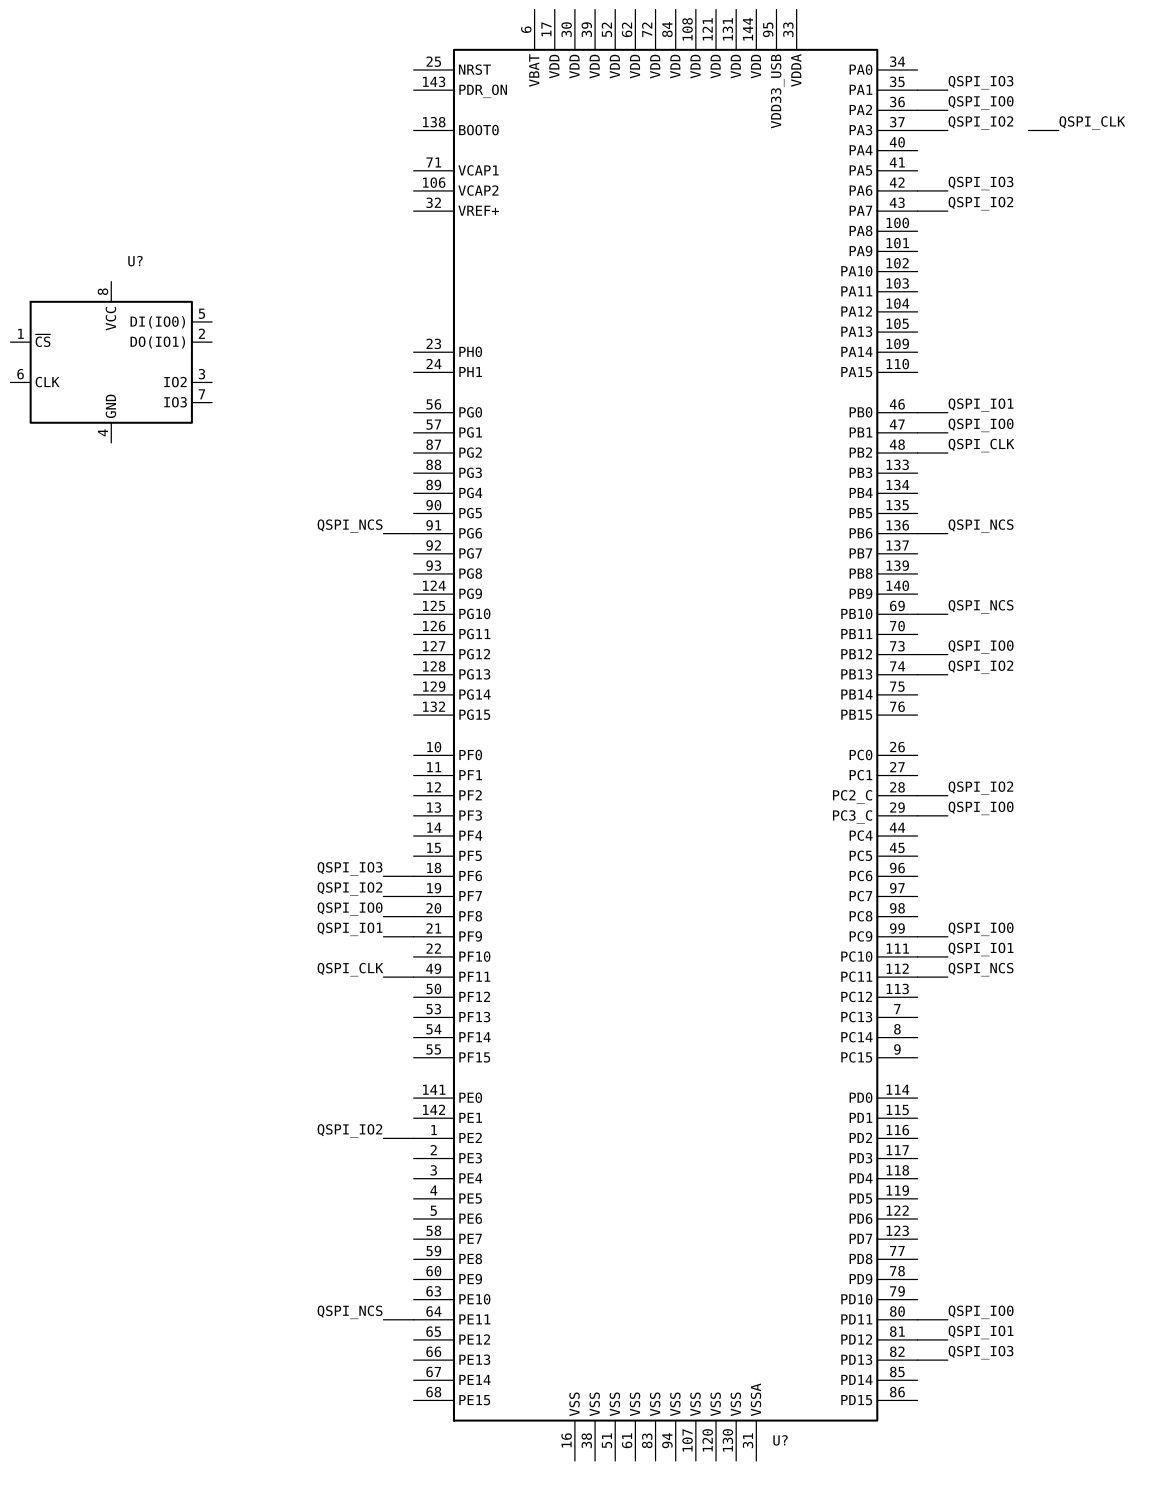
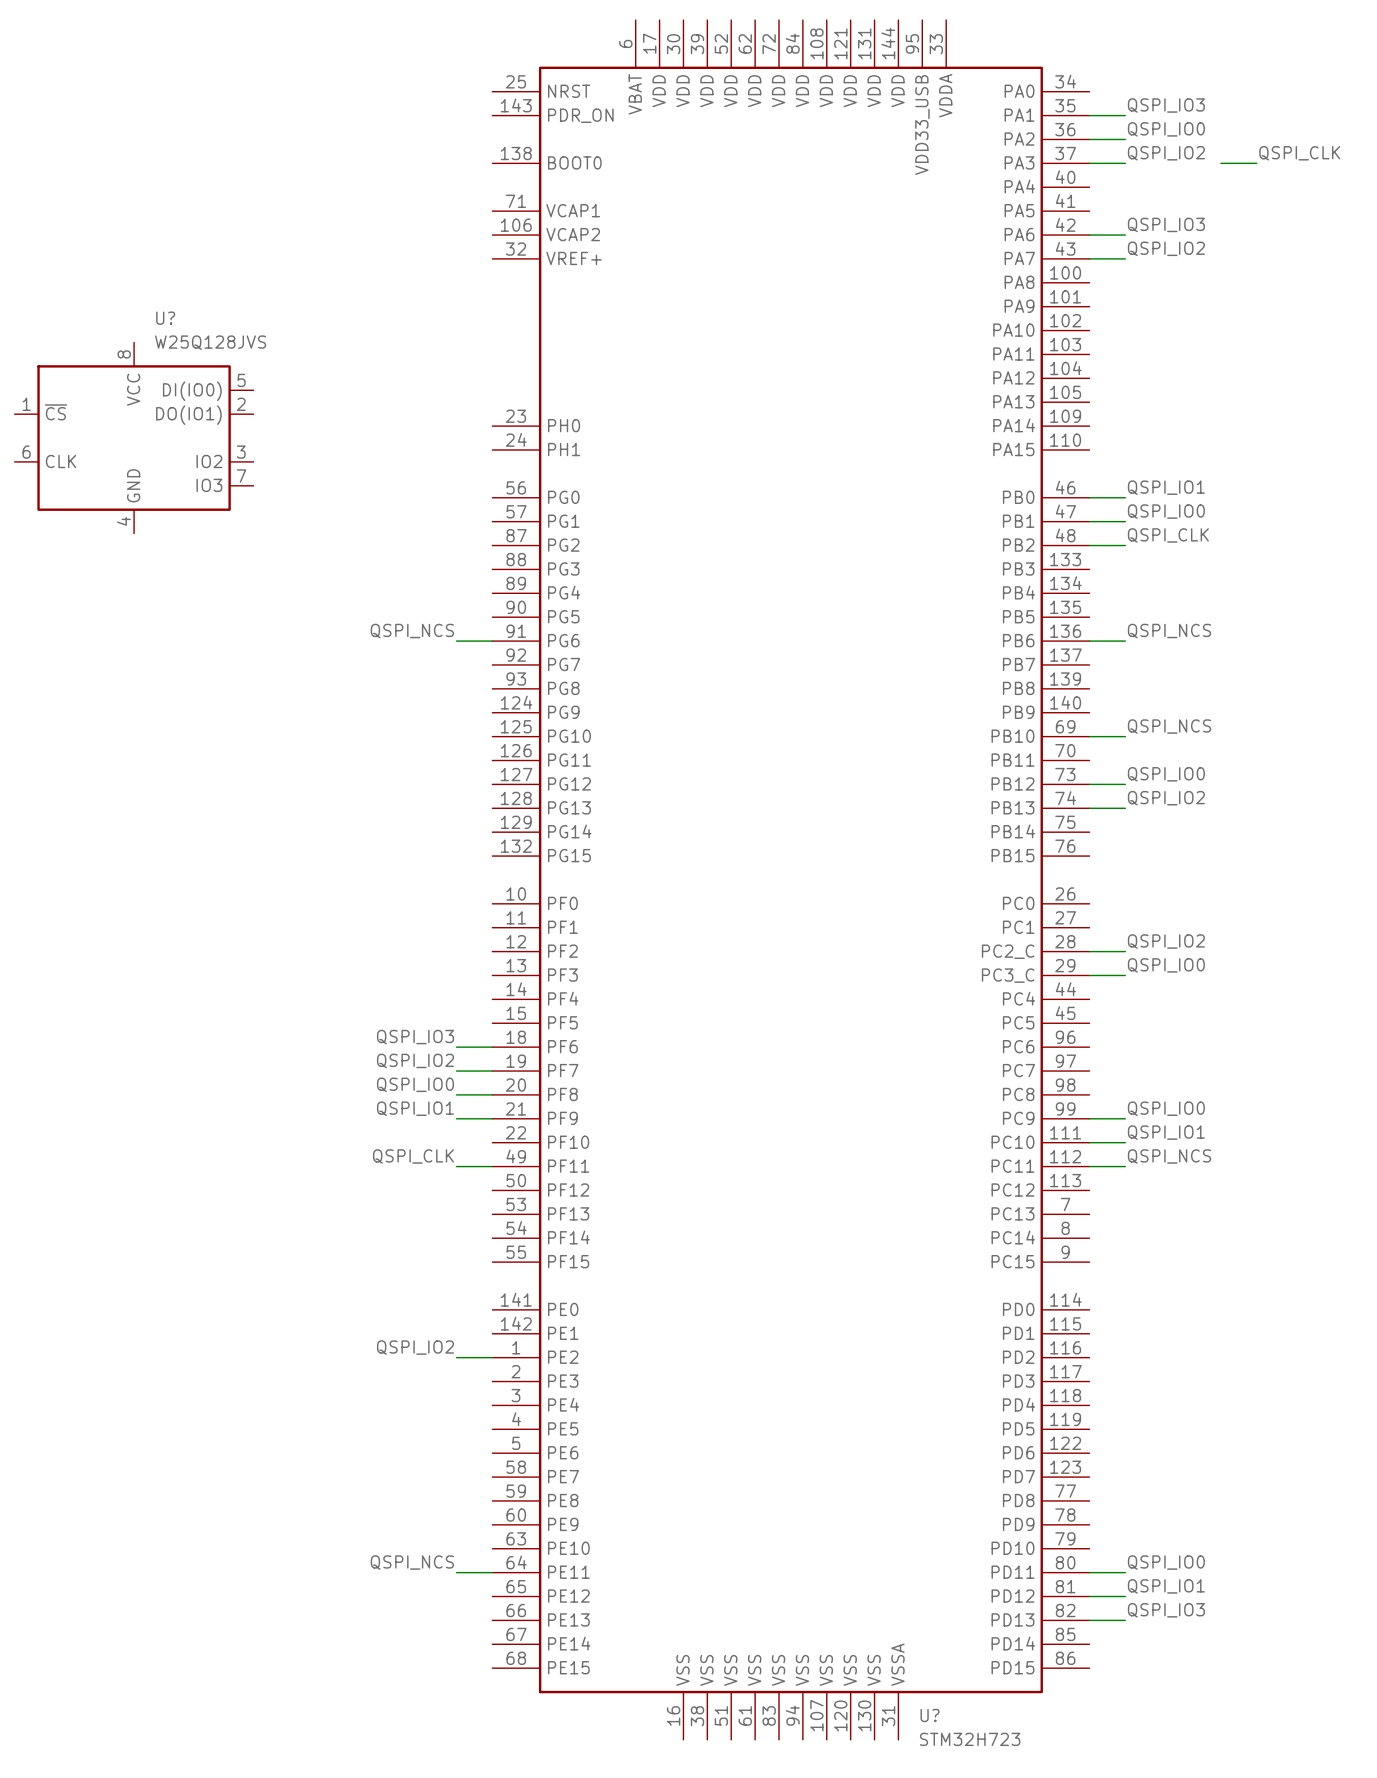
U? value: none -> W25Q128JVS (210, 342)
U? value: none -> STM32H723 (970, 1739)

